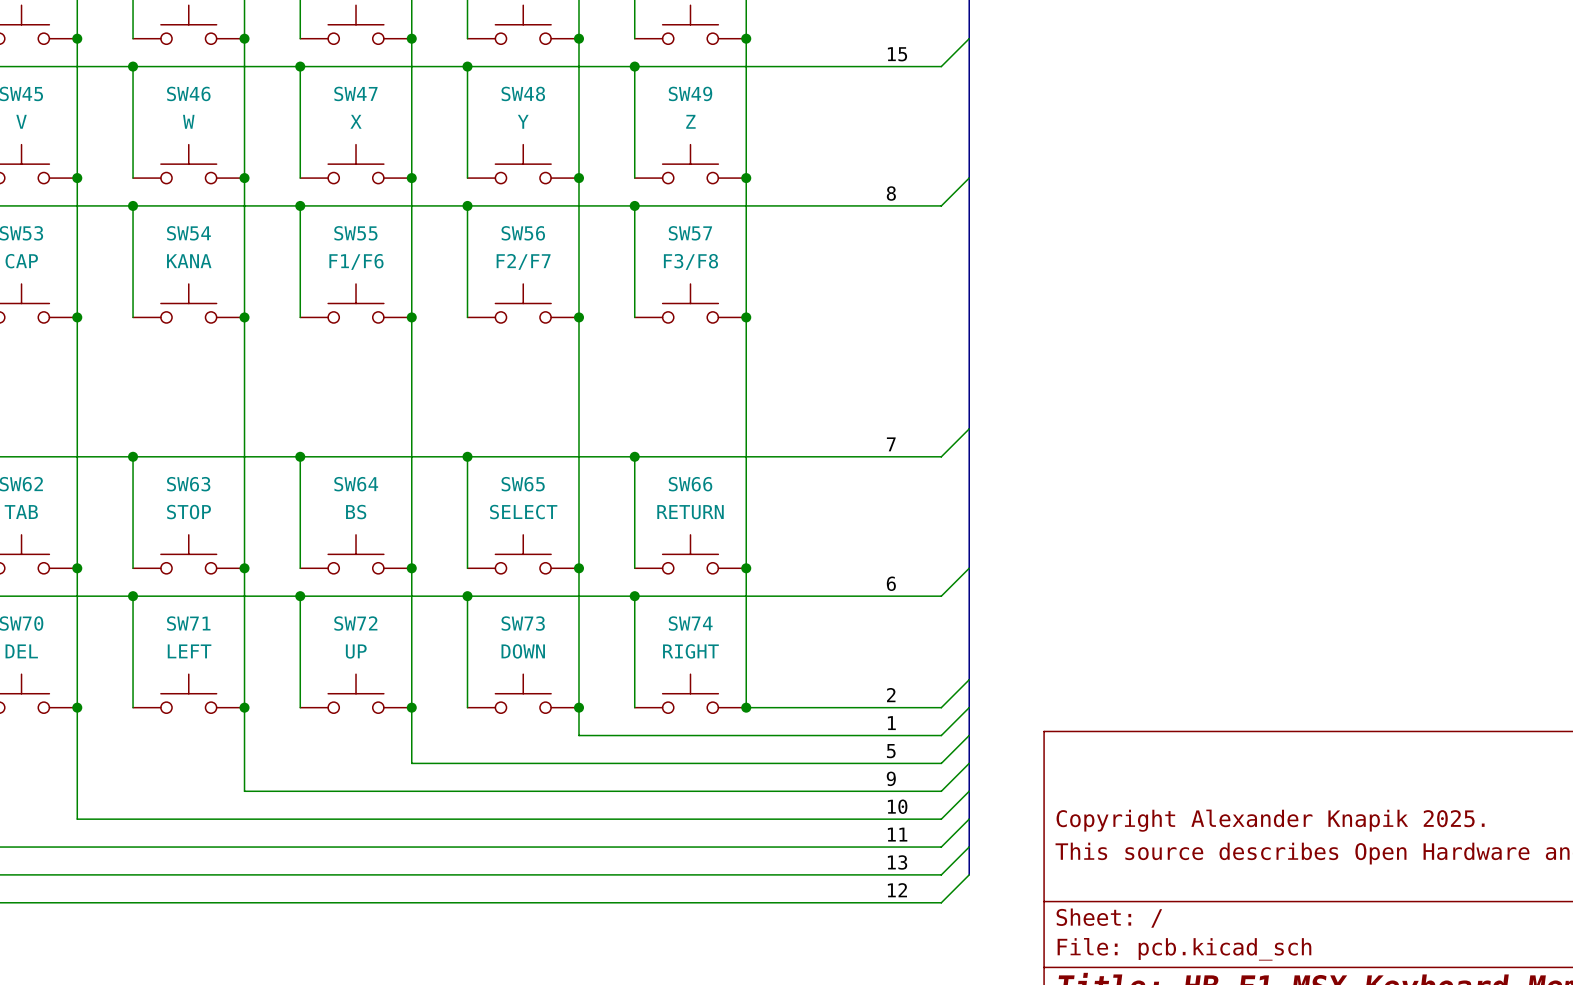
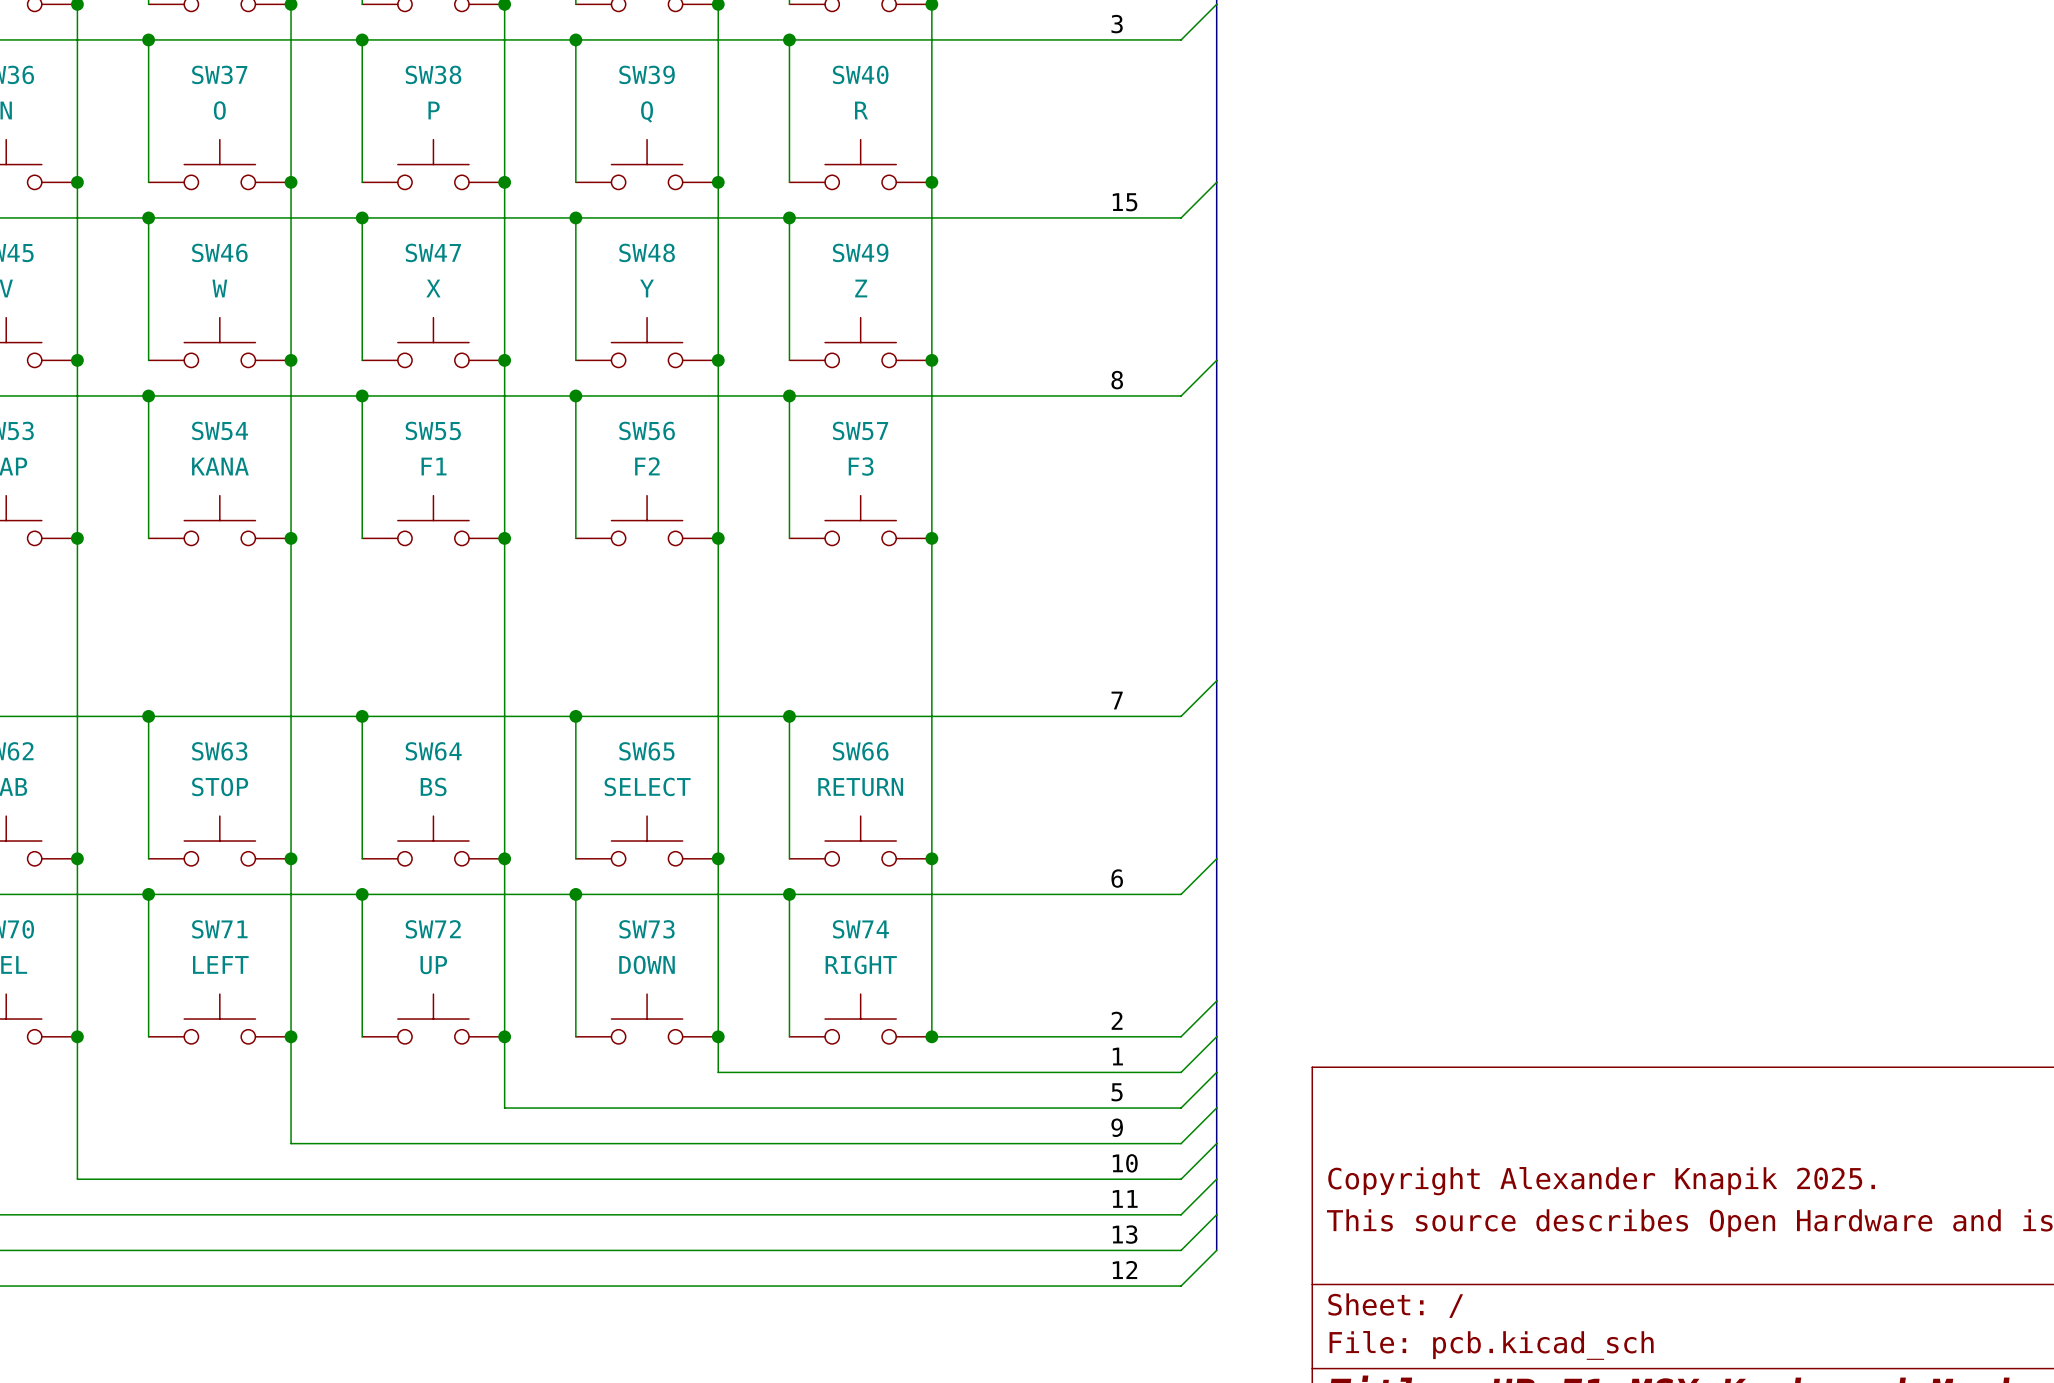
SW55 value: F1/F6 (356, 261) -> F1 (434, 466)
SW56 value: F2/F7 (523, 261) -> F2 (647, 466)
SW57 value: F3/F8 (690, 261) -> F3 (861, 466)

